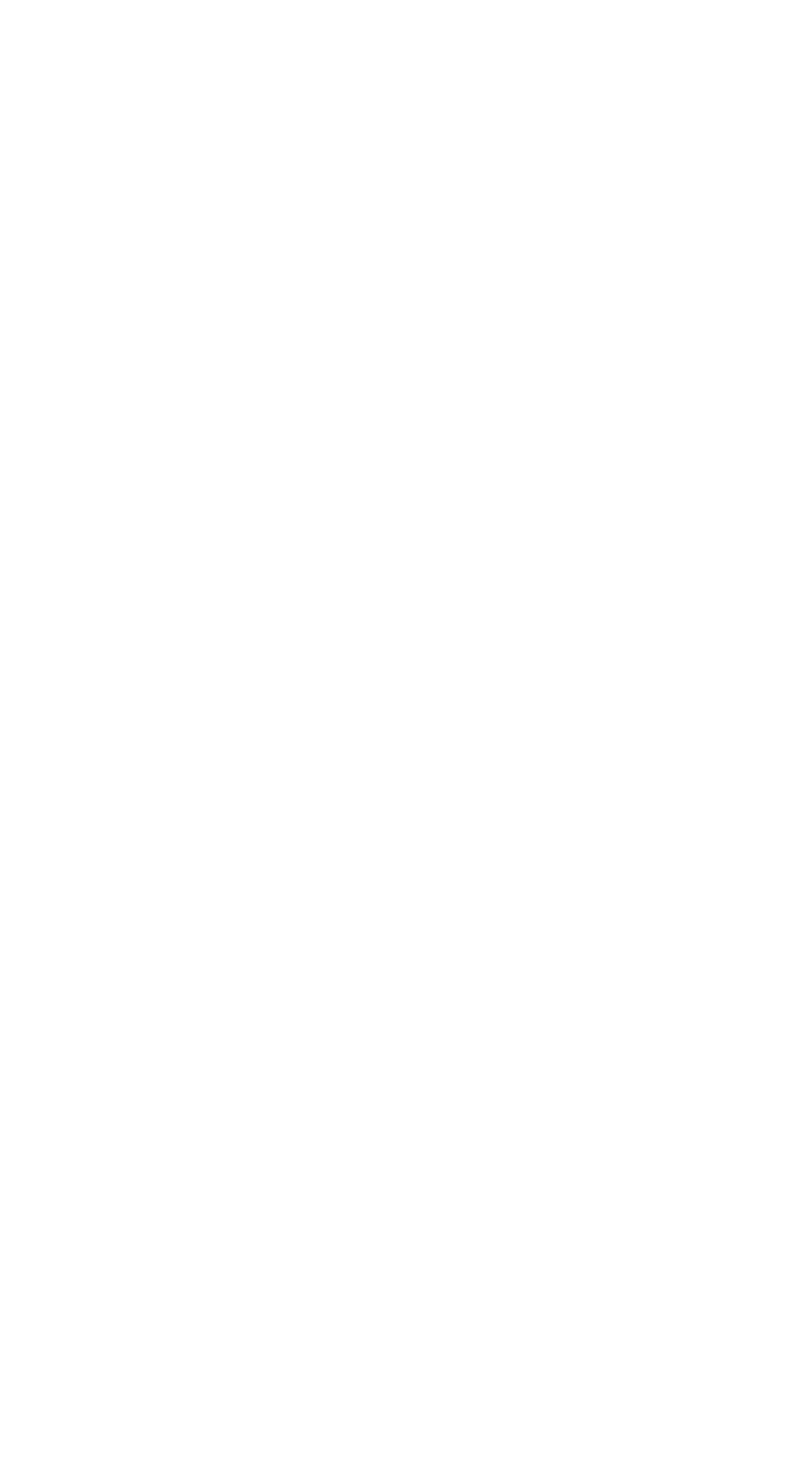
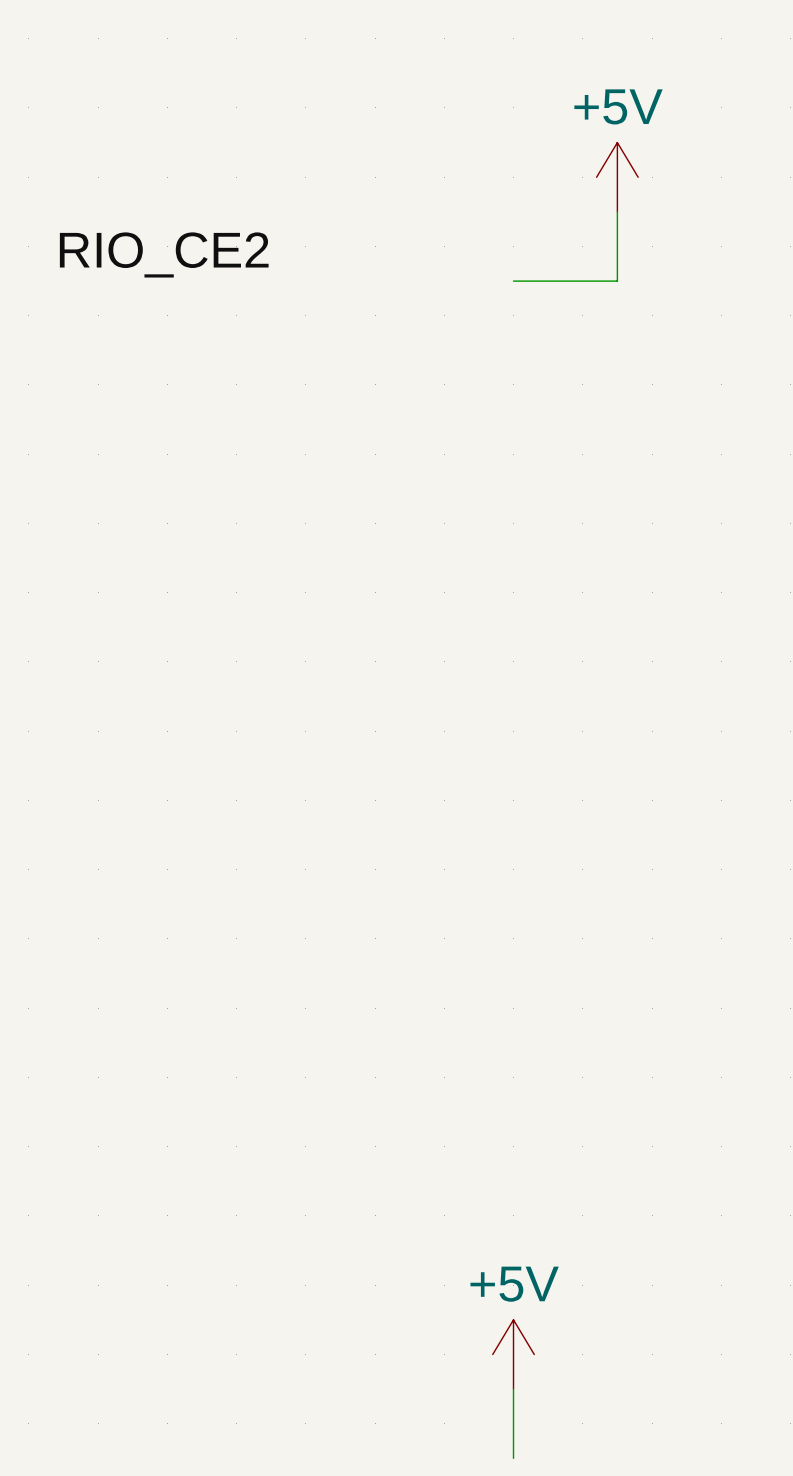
power symbol: none -> +5V (617, 177)
wire: none -> (617, 211) (617, 281) (513, 281)
label: none -> RIO_CE2 (164, 254)
power symbol: none -> +5V (513, 1354)
wire: none -> (513, 1389) (513, 1458)

